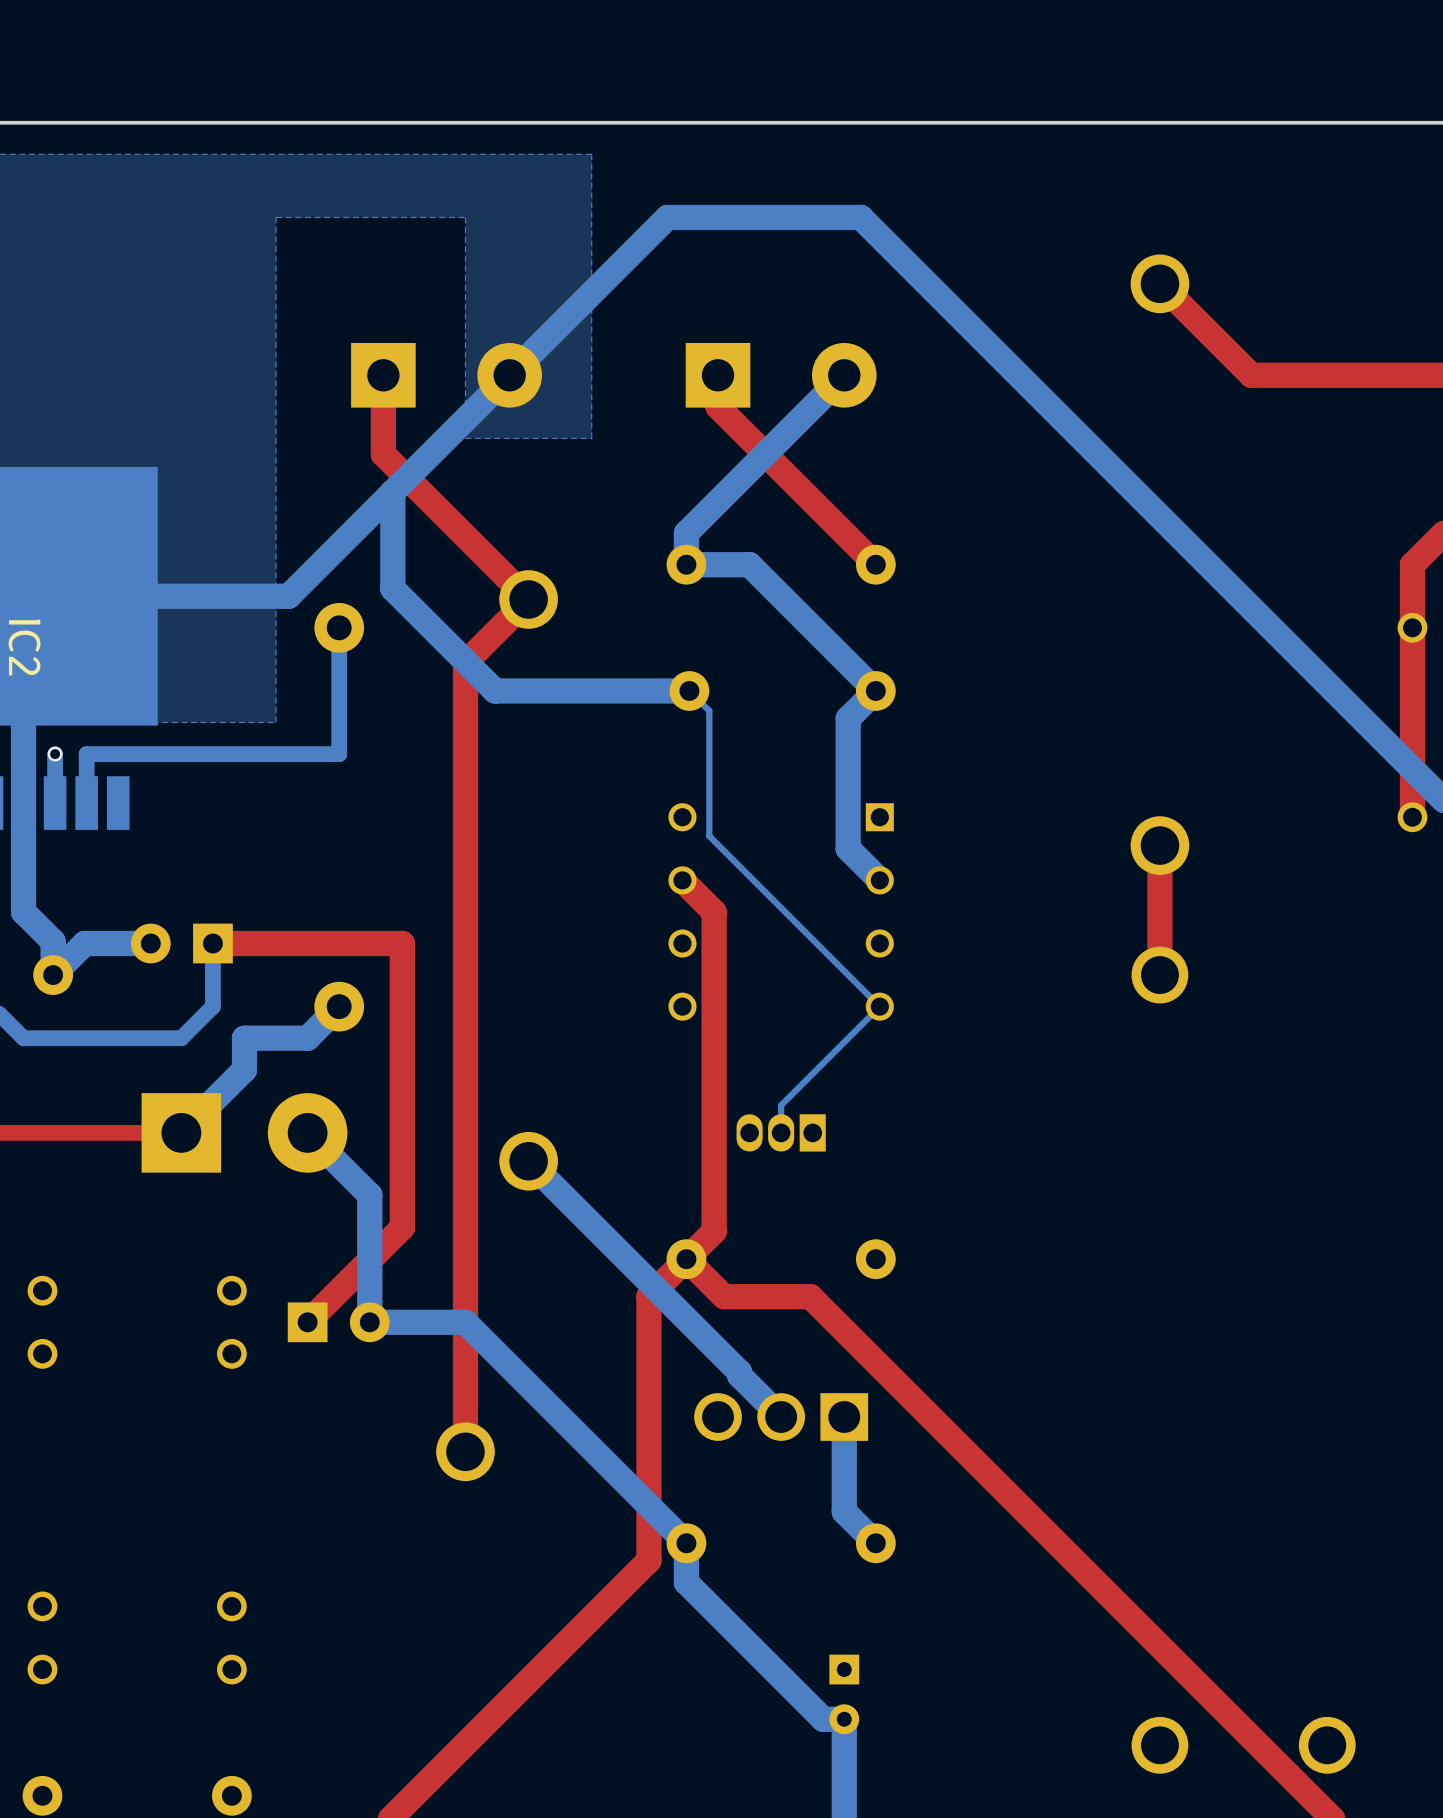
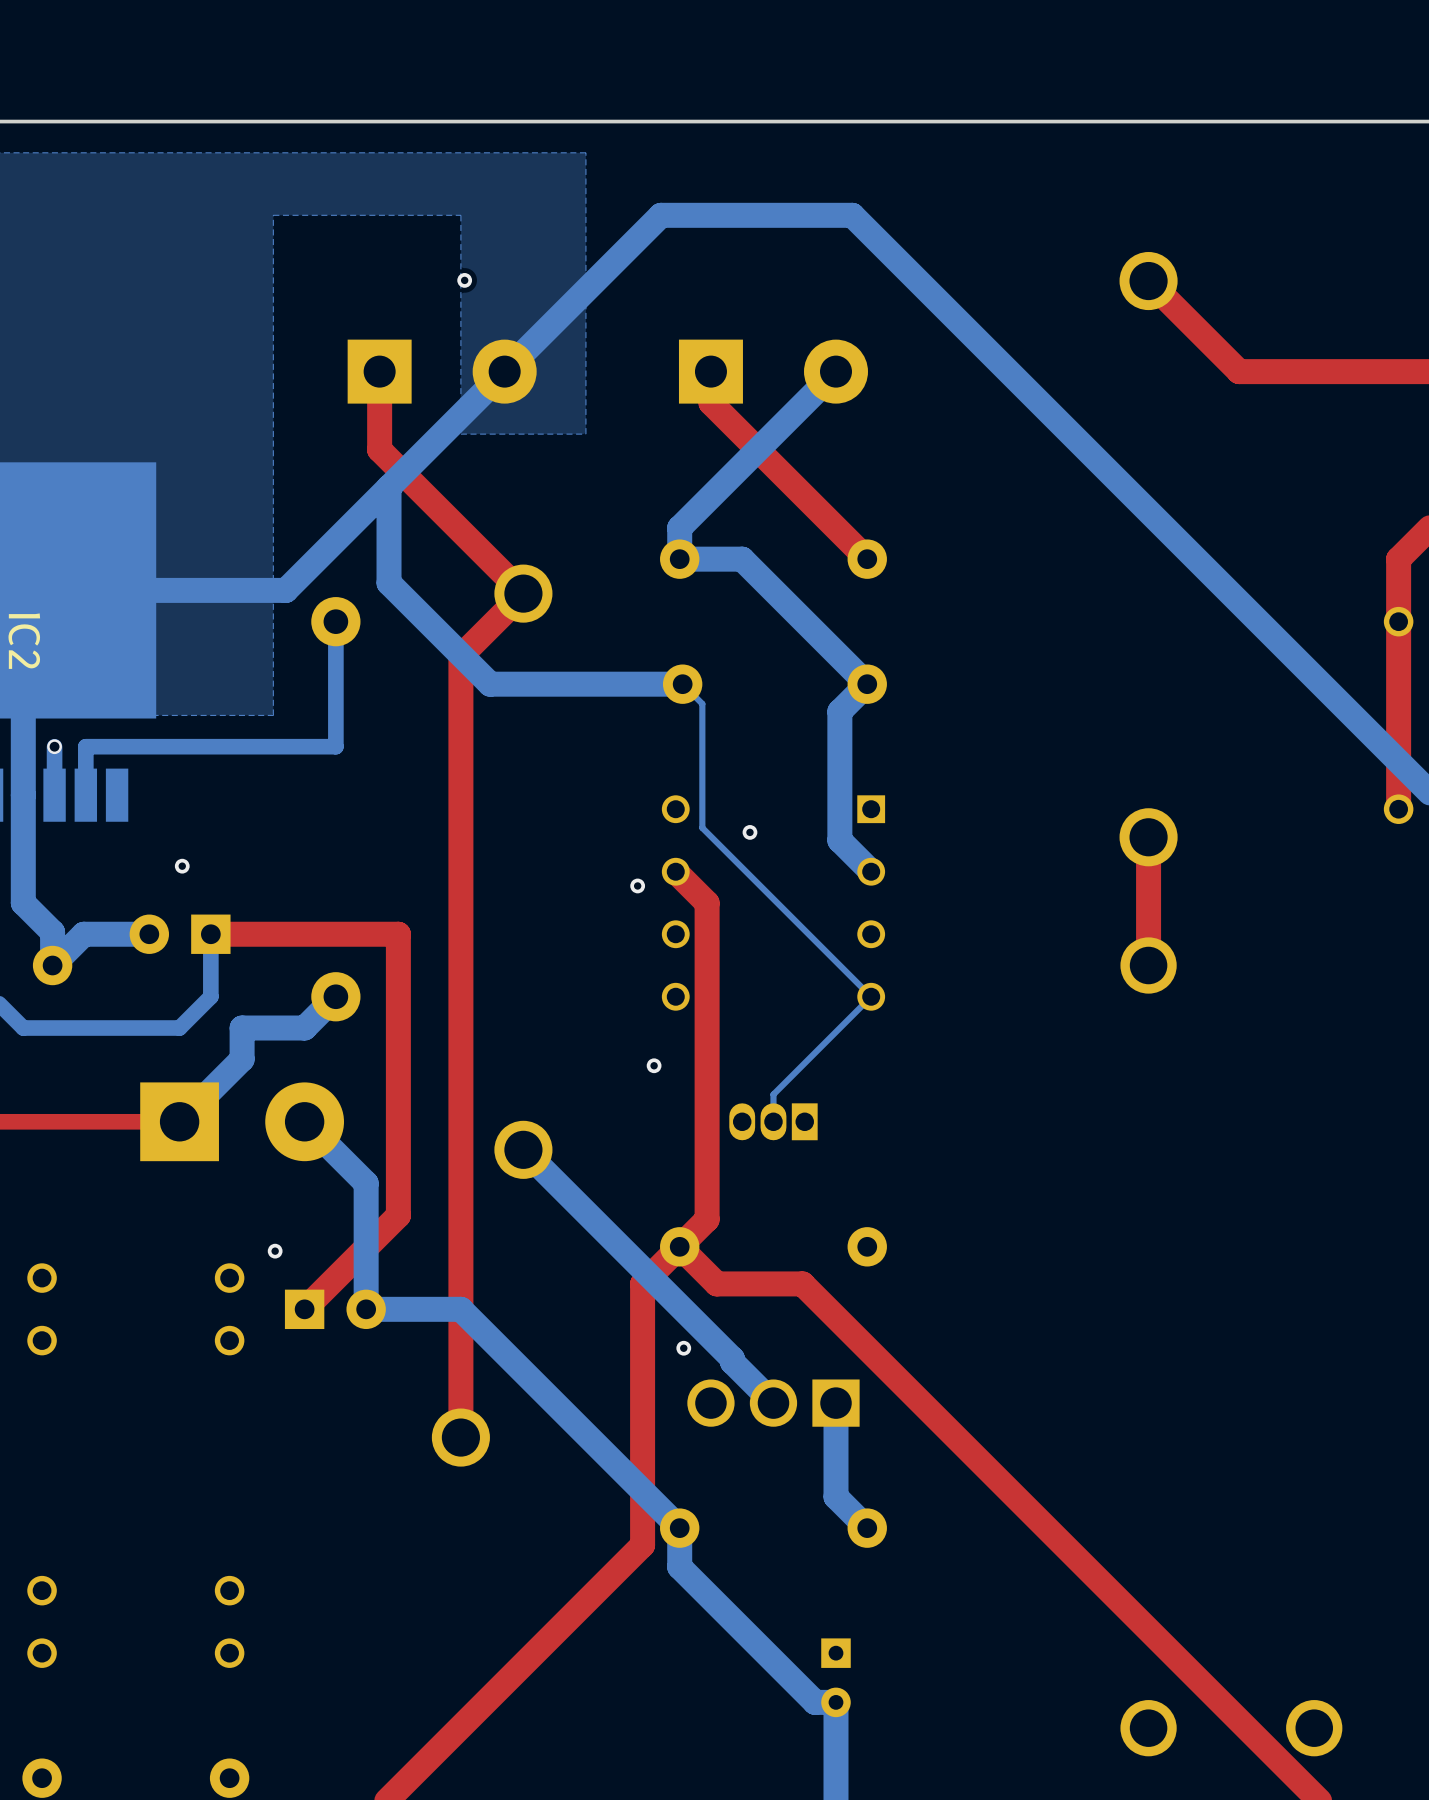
via: none -> (464, 280)
via: none -> (749, 832)
via: none -> (182, 866)
via: none -> (637, 885)
via: none -> (654, 1065)
via: none -> (275, 1251)
via: none -> (683, 1348)

